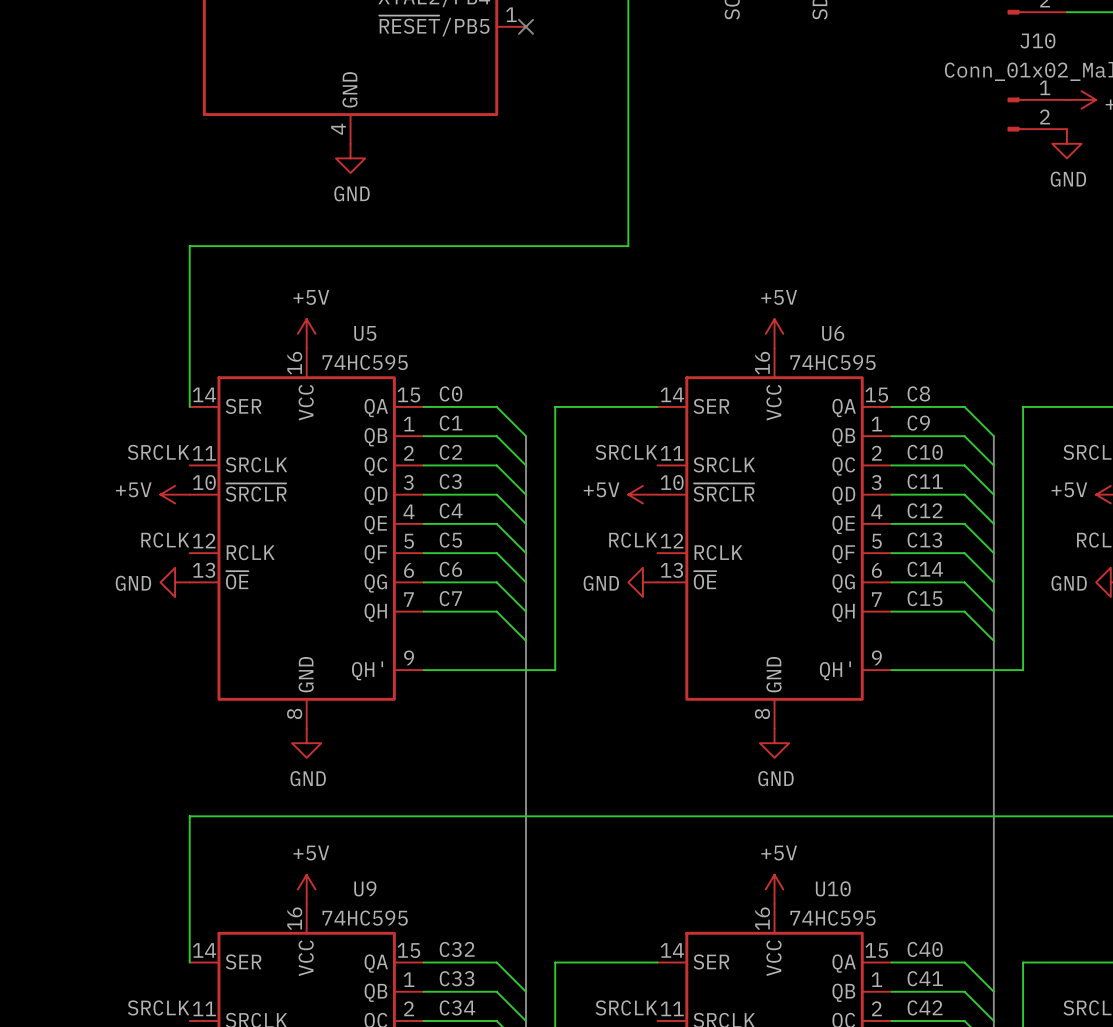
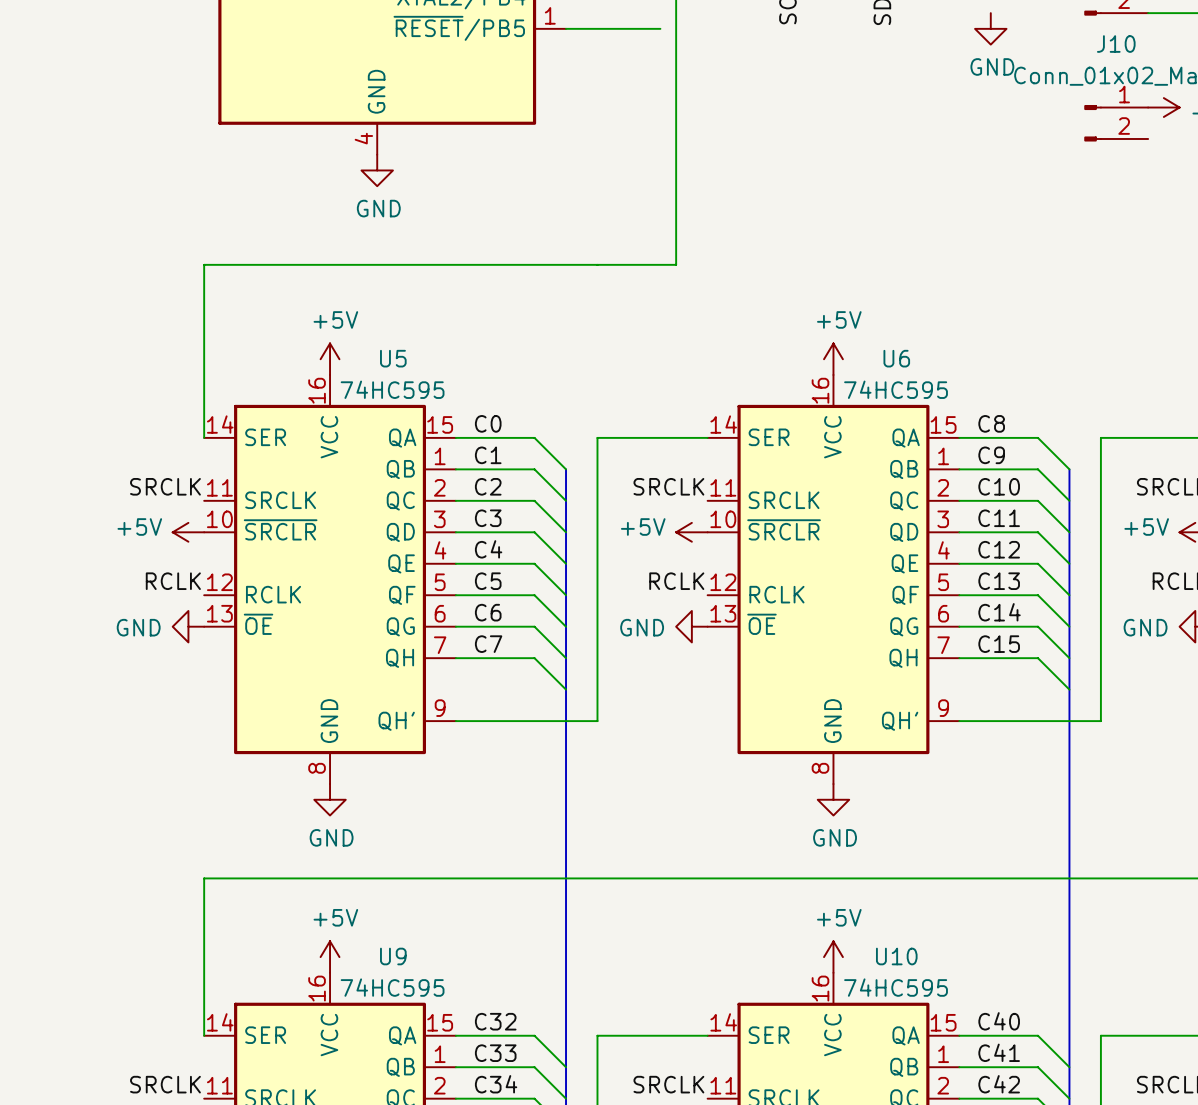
wire: none -> (566, 28) (660, 28)
no-connect mark: (525, 26) -> none
power symbol position: GND (1066, 143) -> GND (990, 28)

